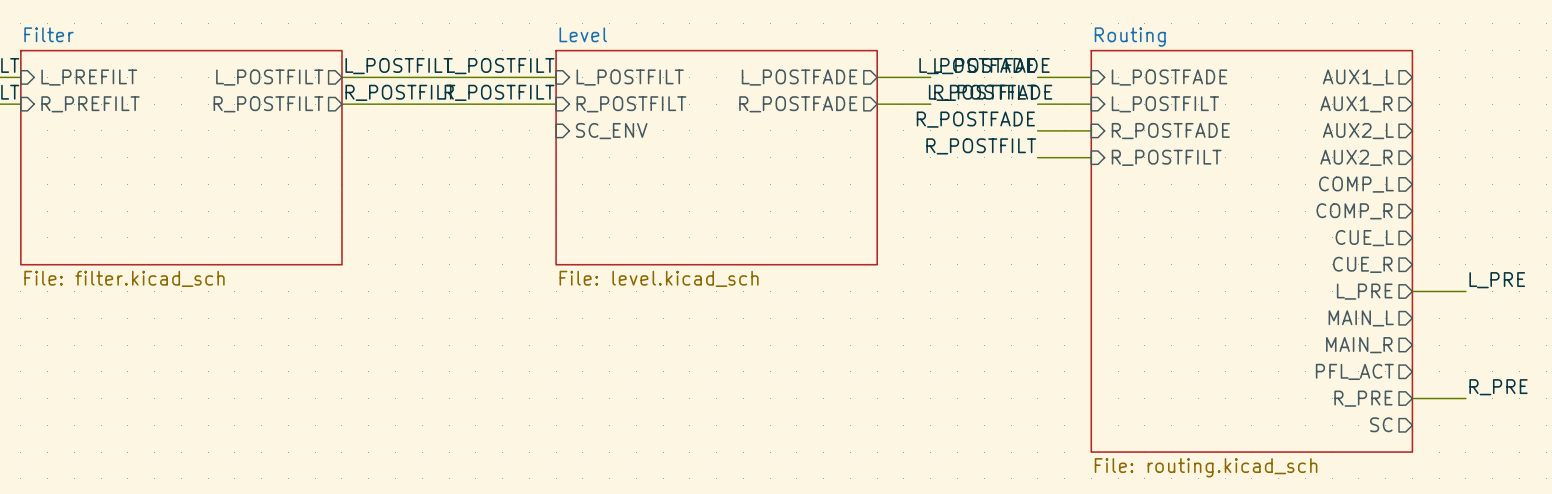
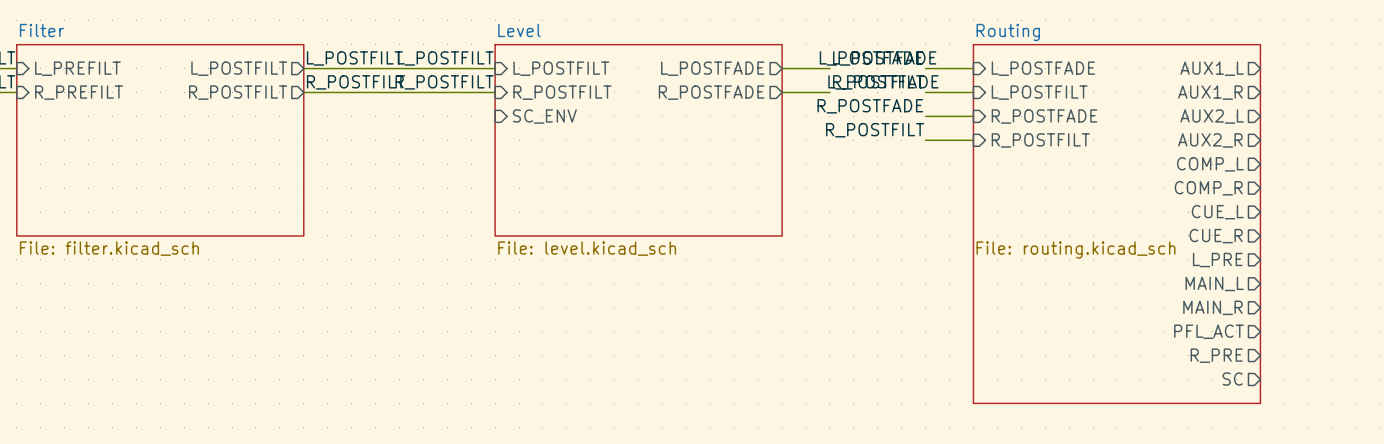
label: L_PRE (1497, 280) -> none
wire: (1412, 291) (1465, 291) -> none
label: R_PRE (1498, 387) -> none
wire: (1412, 398) (1465, 398) -> none
sheet Routing value position: File: routing.kicad_sch (1206, 467) -> File: routing.kicad_sch (1076, 250)

